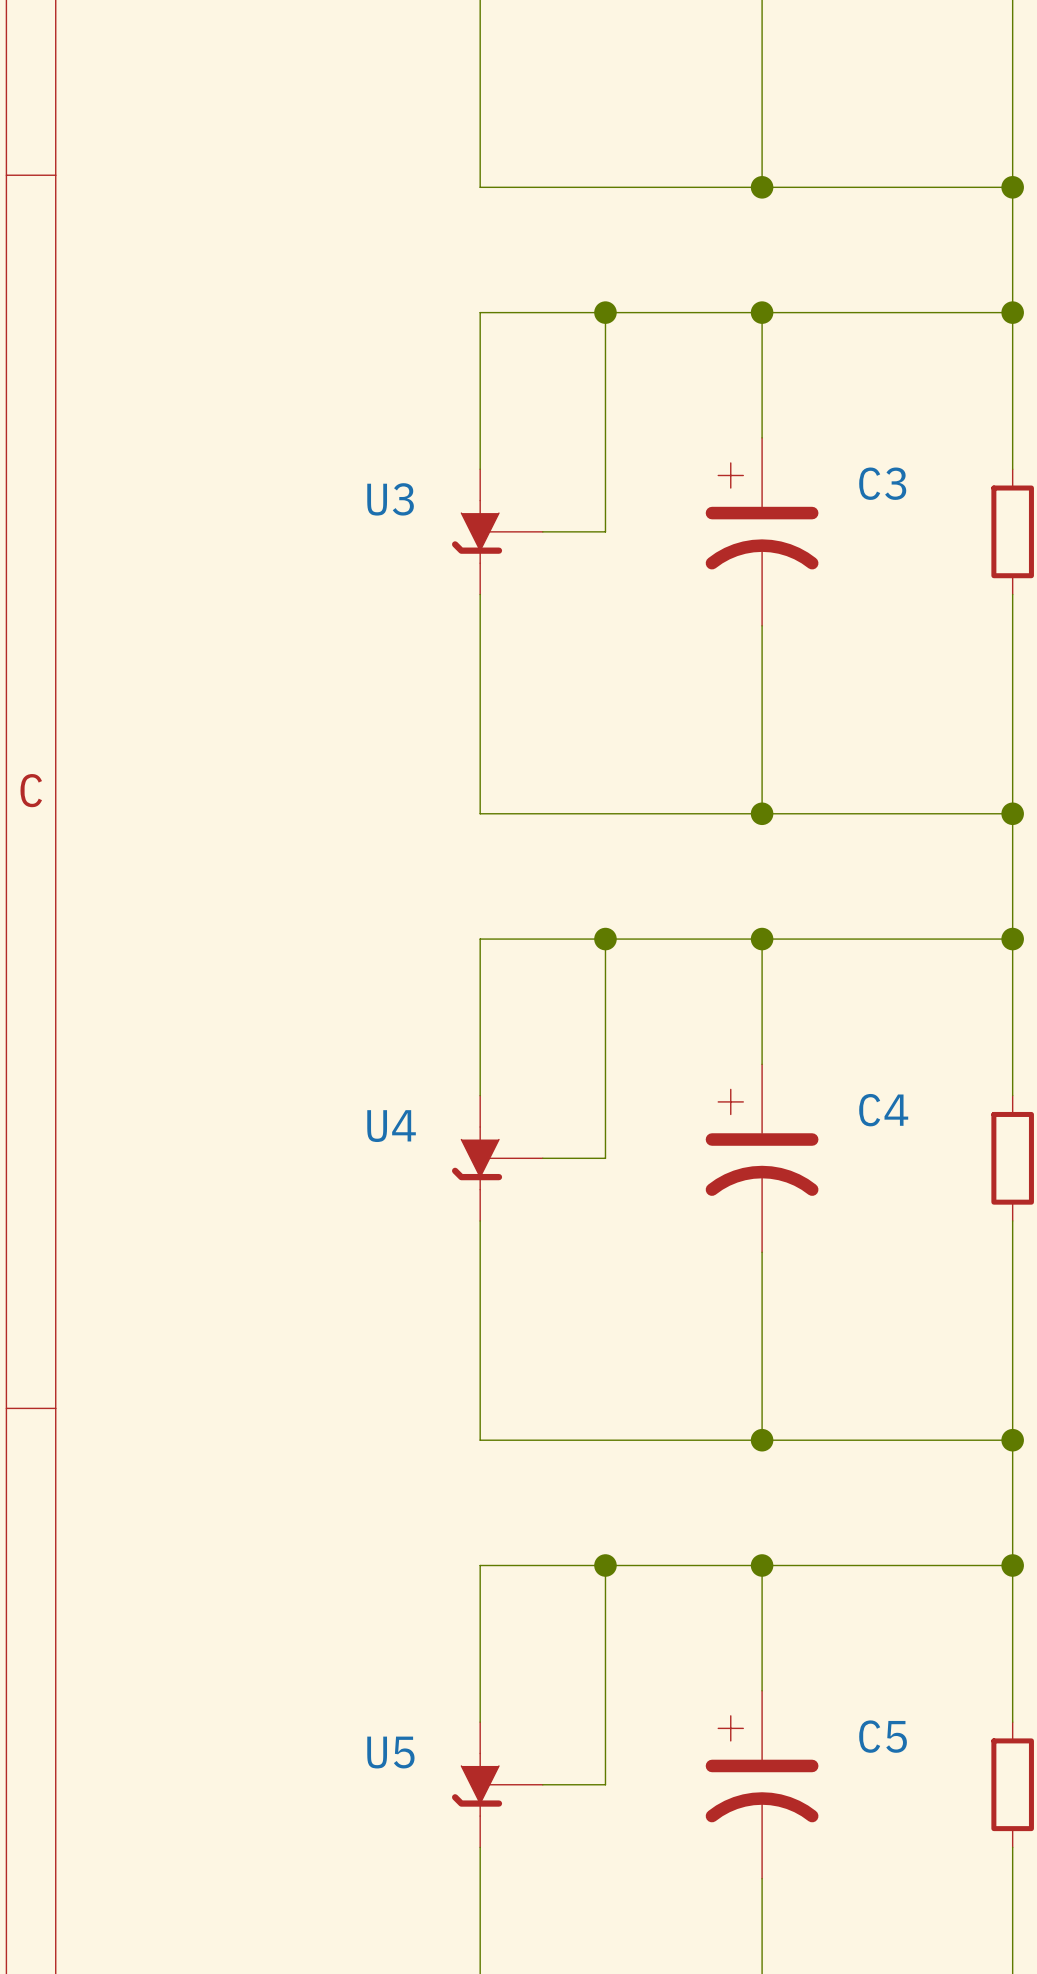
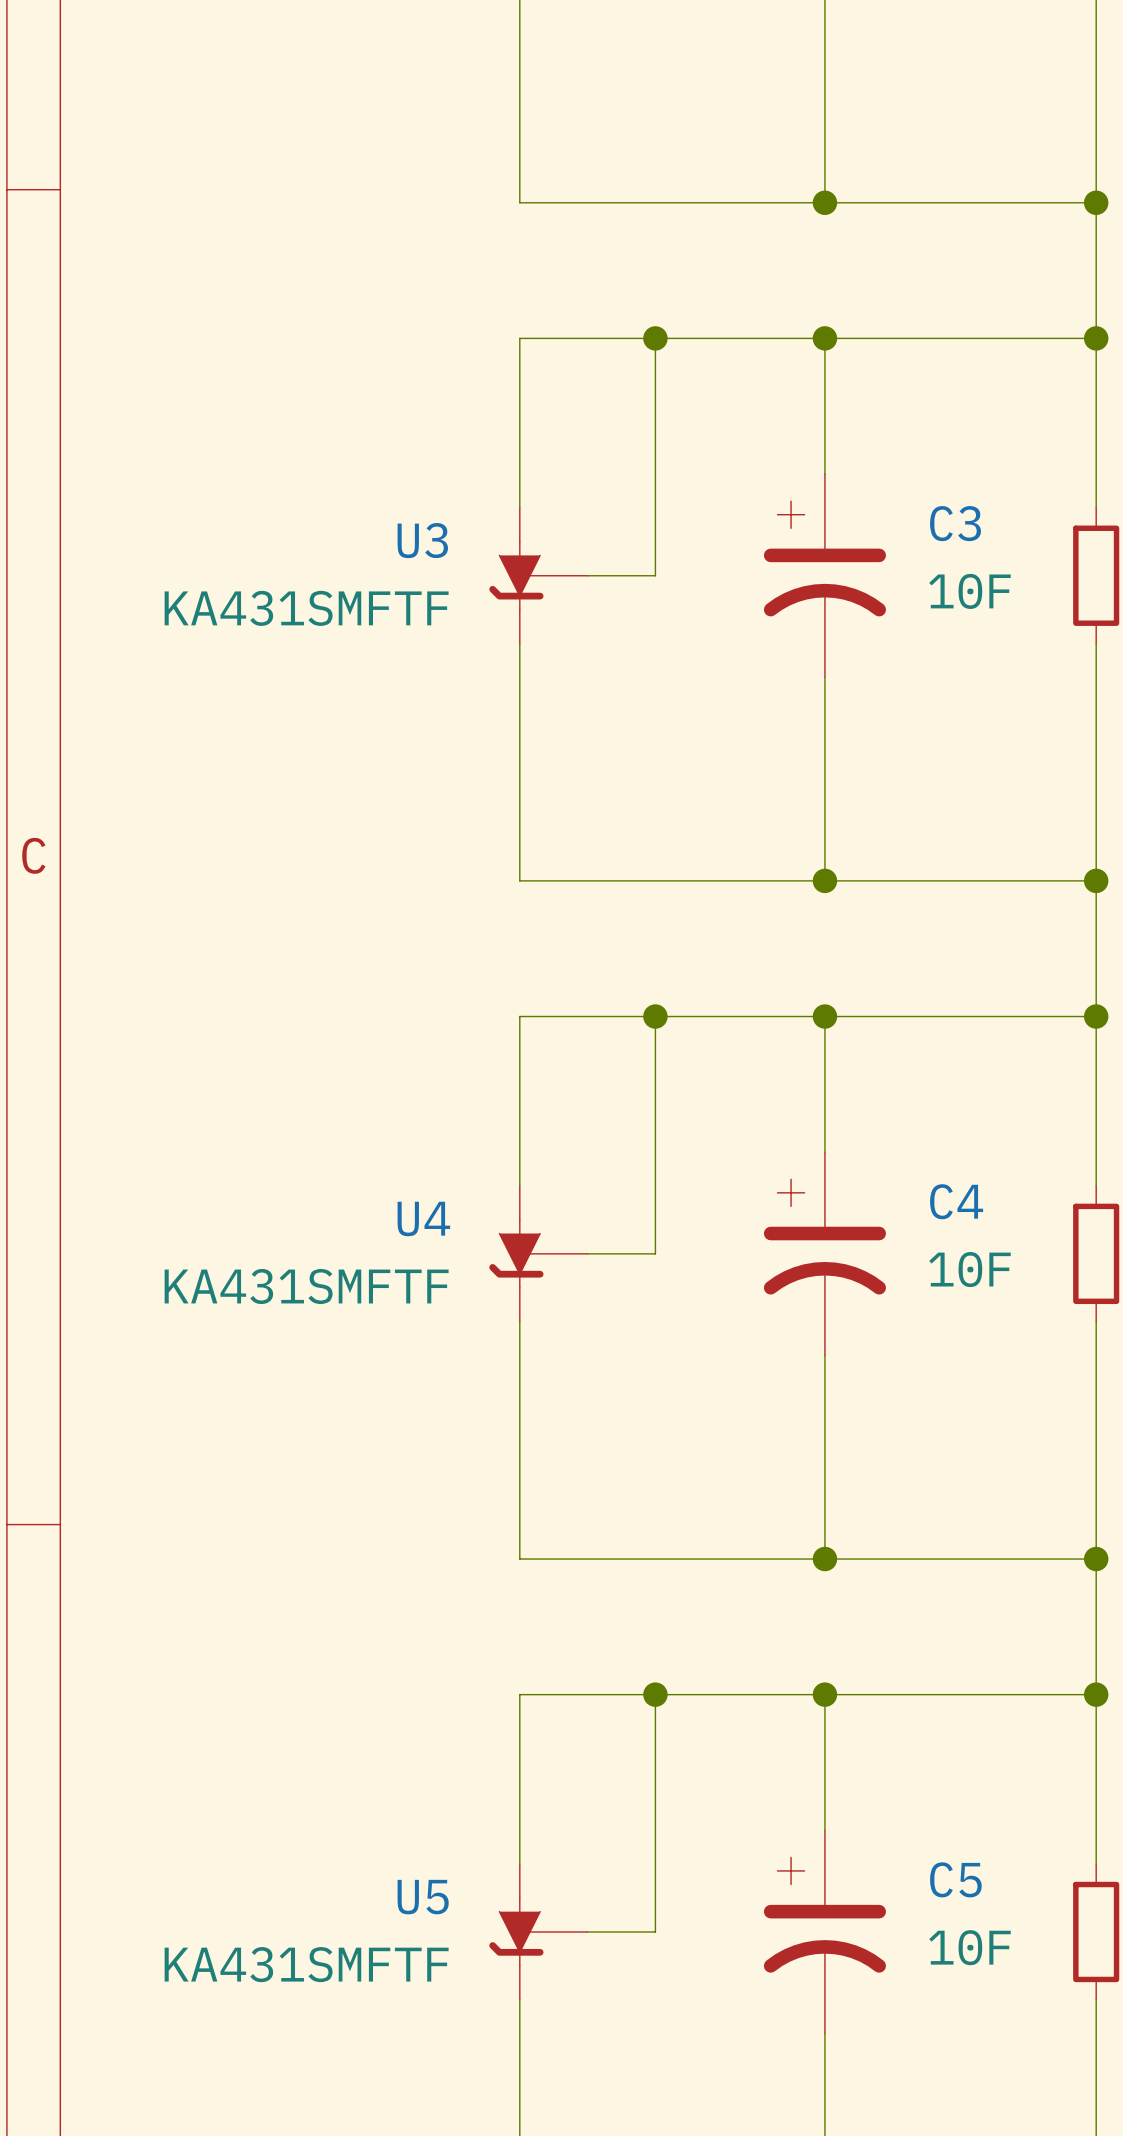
C3 value: none -> 10F (969, 591)
U3 value: none -> KA431SMFTF (306, 608)
C4 value: none -> 10F (969, 1269)
U4 value: none -> KA431SMFTF (306, 1286)
C5 value: none -> 10F (969, 1947)
U5 value: none -> KA431SMFTF (306, 1964)

